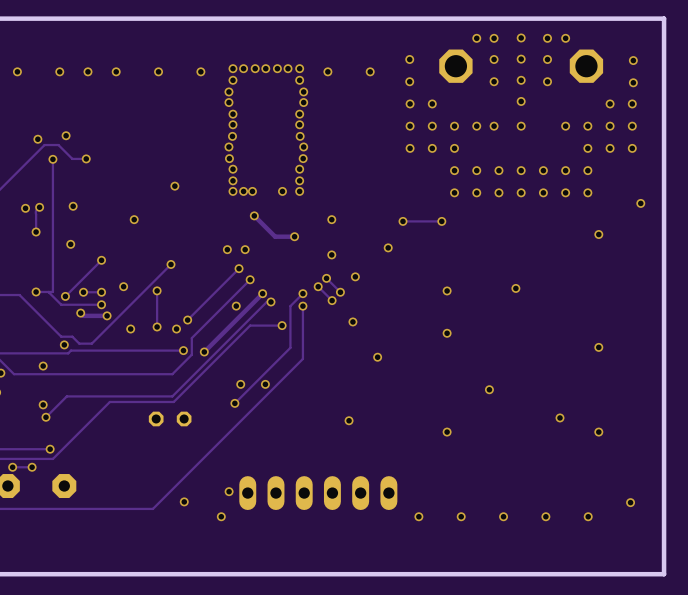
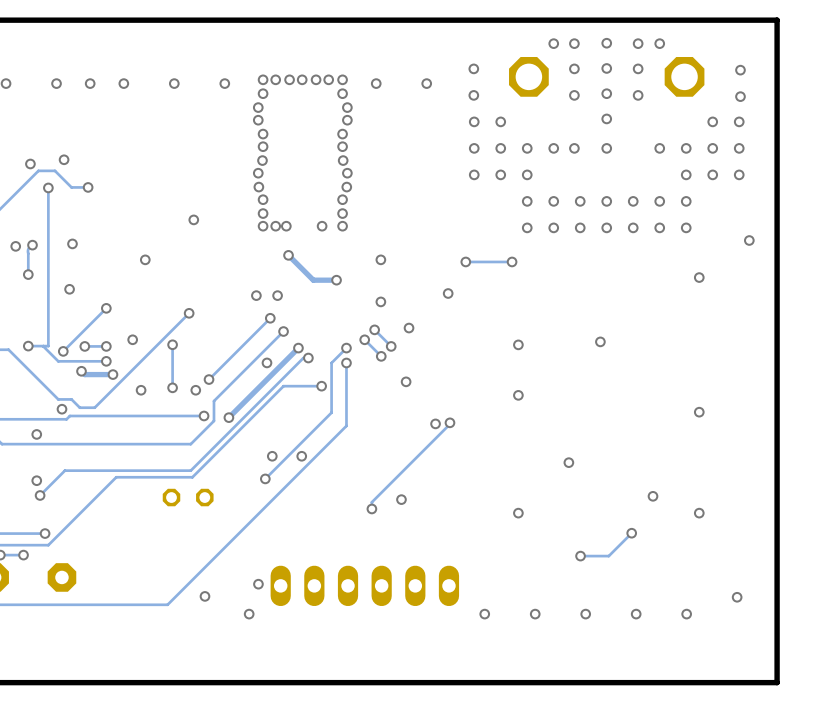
track: none -> (449, 422) (371, 502) (371, 508)
via: none -> (449, 422)
via: none -> (371, 508)
track: none -> (631, 533) (608, 556) (580, 556)
via: none -> (631, 533)
via: none -> (580, 556)

